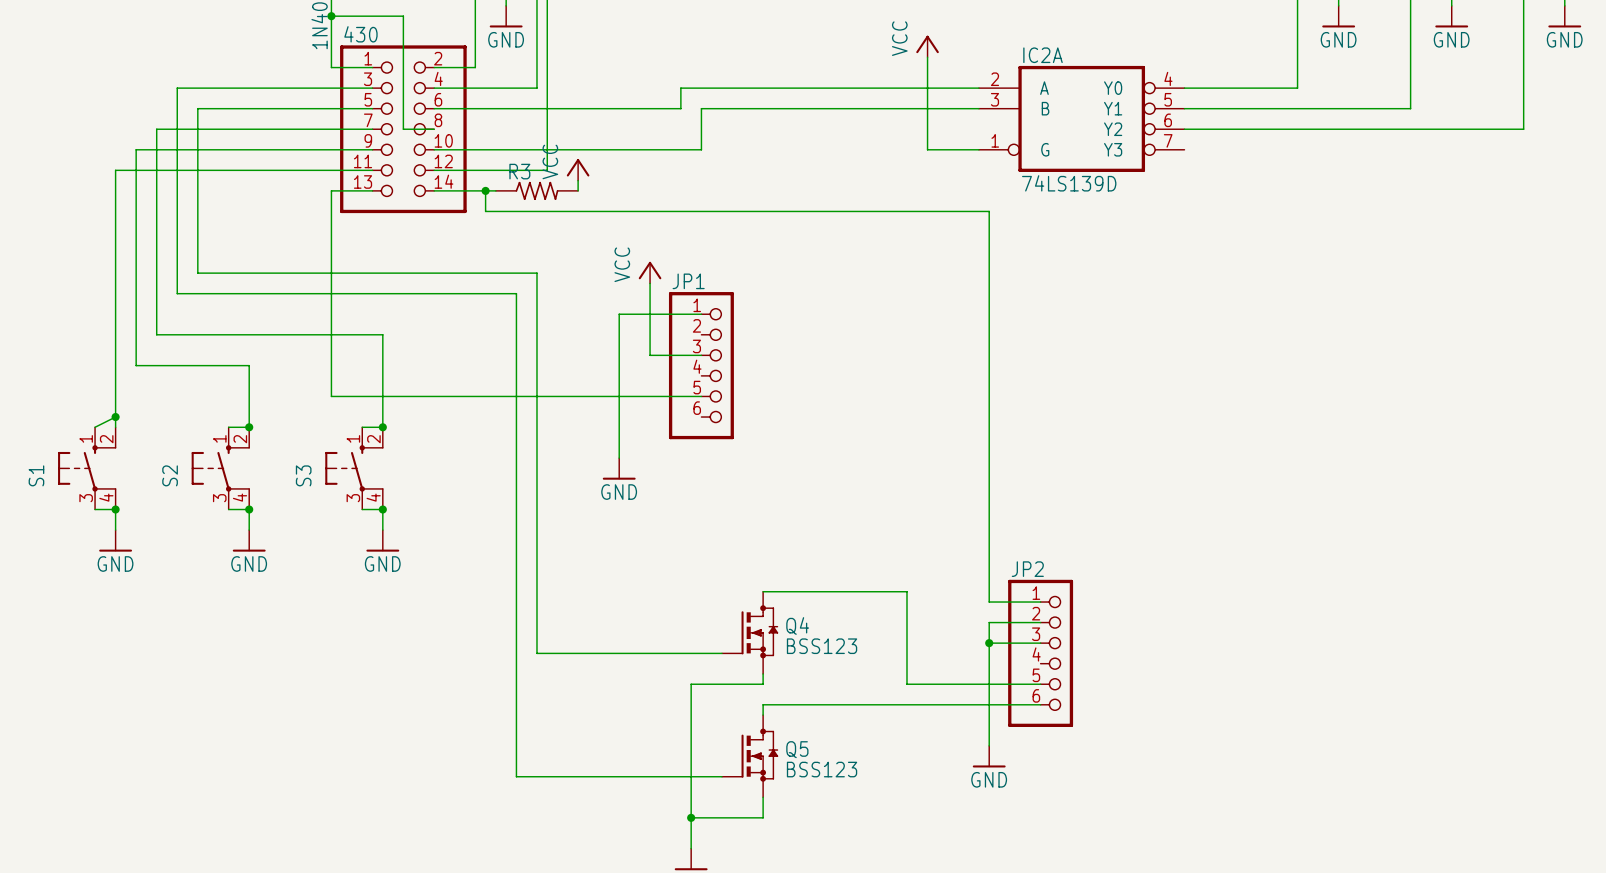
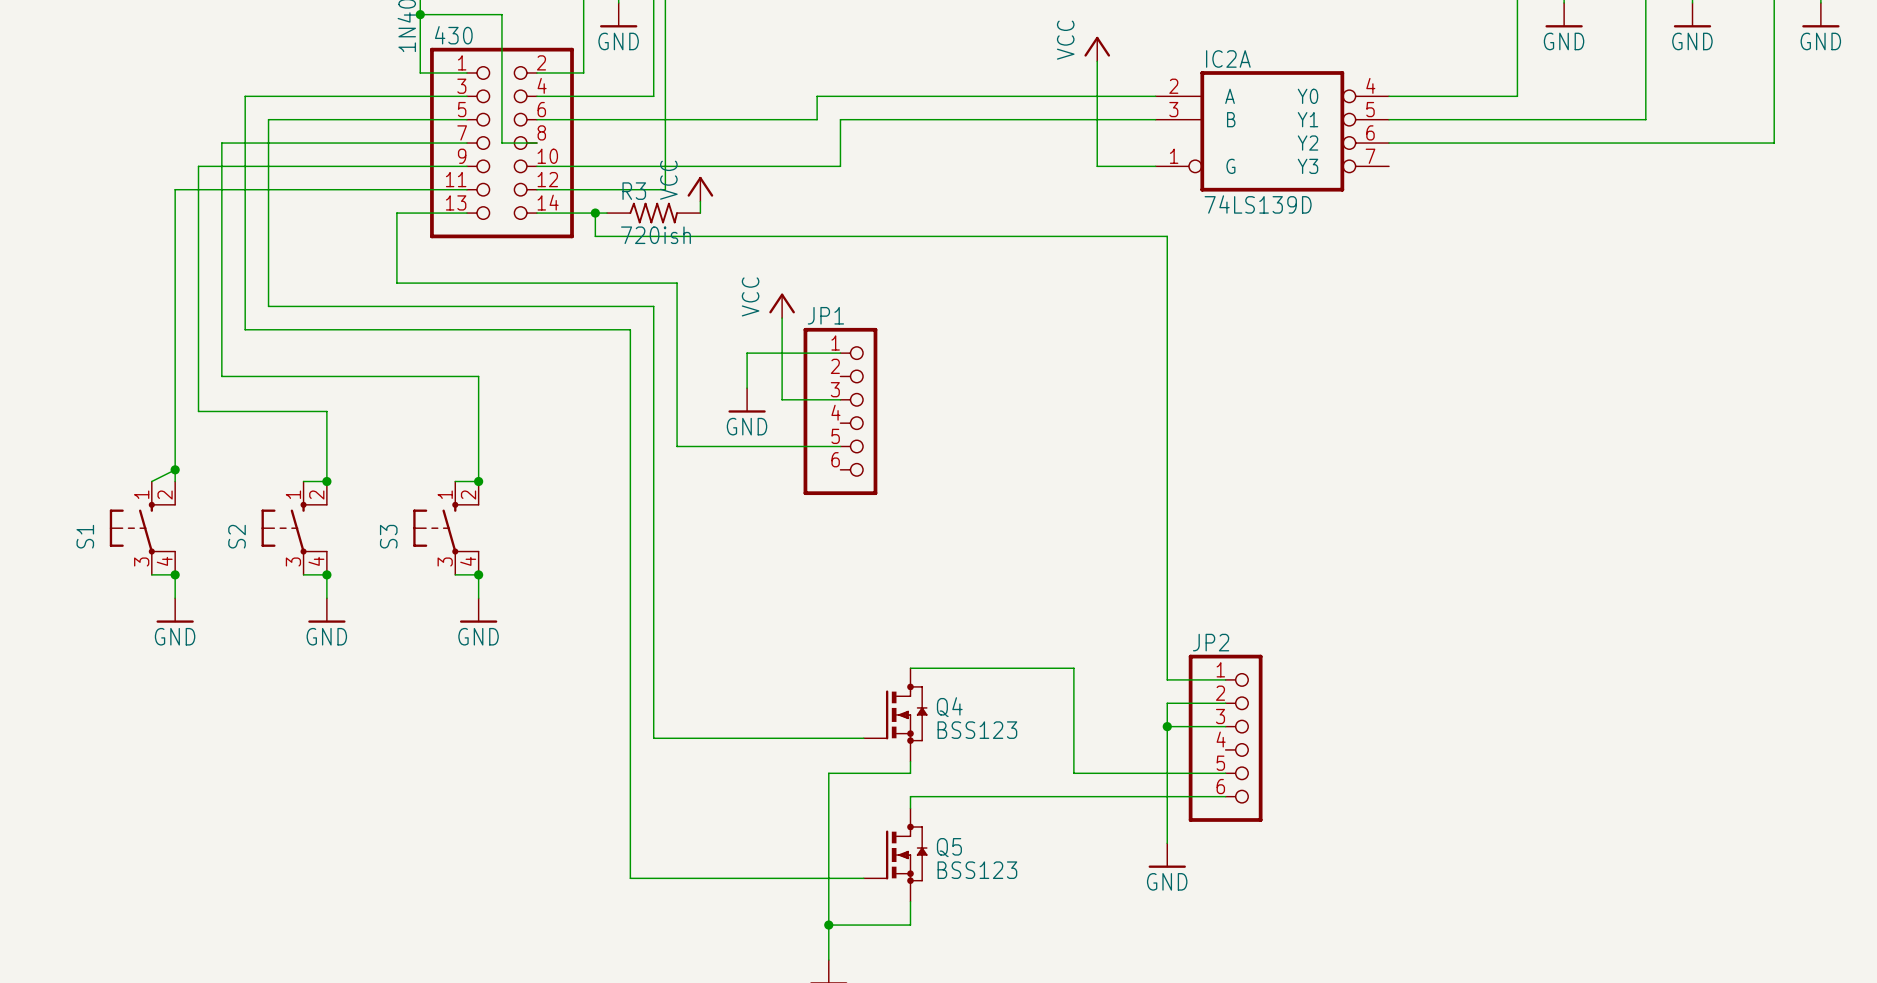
wire: (331, 190) (331, 396) (557, 396) -> (420, 213) (396, 213) (396, 283) (677, 283) (677, 446)
R3 value: none -> 720ish (655, 235)
wire: (619, 345) (619, 458) -> none
power symbol position: GND (619, 468) -> GND (747, 400)

